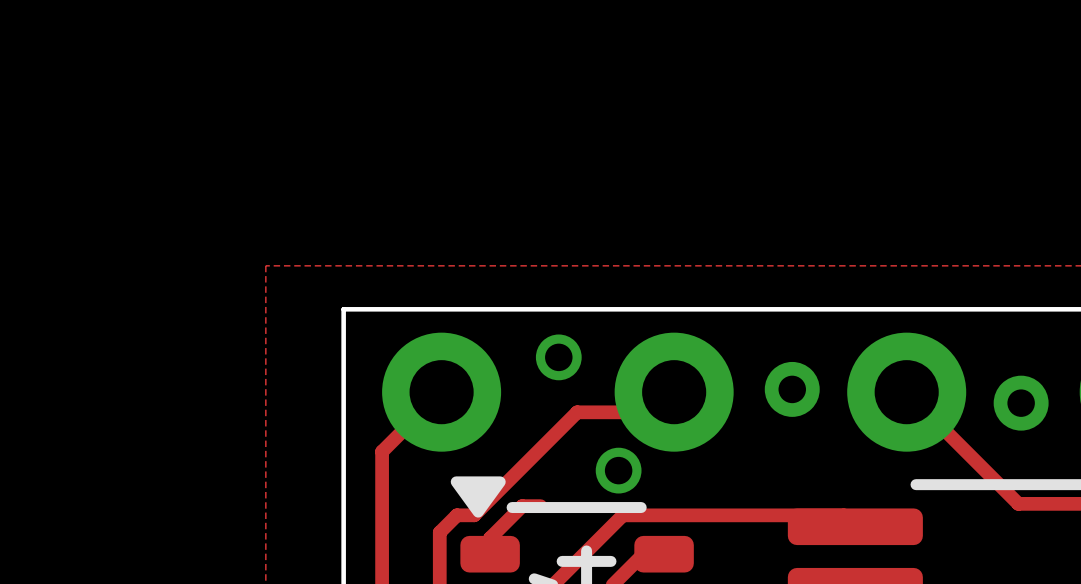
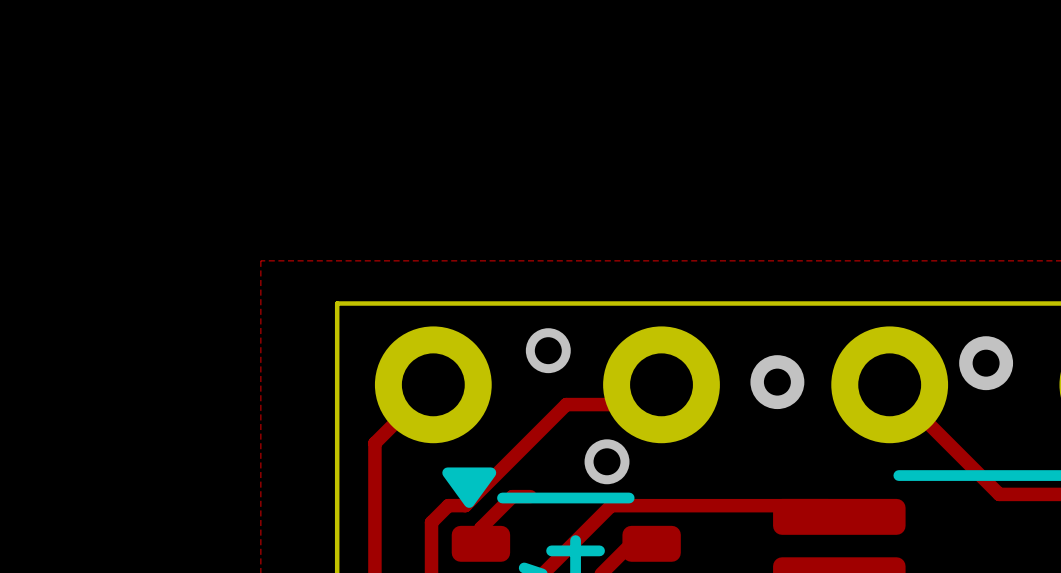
via position: (1021, 403) -> (986, 363)

